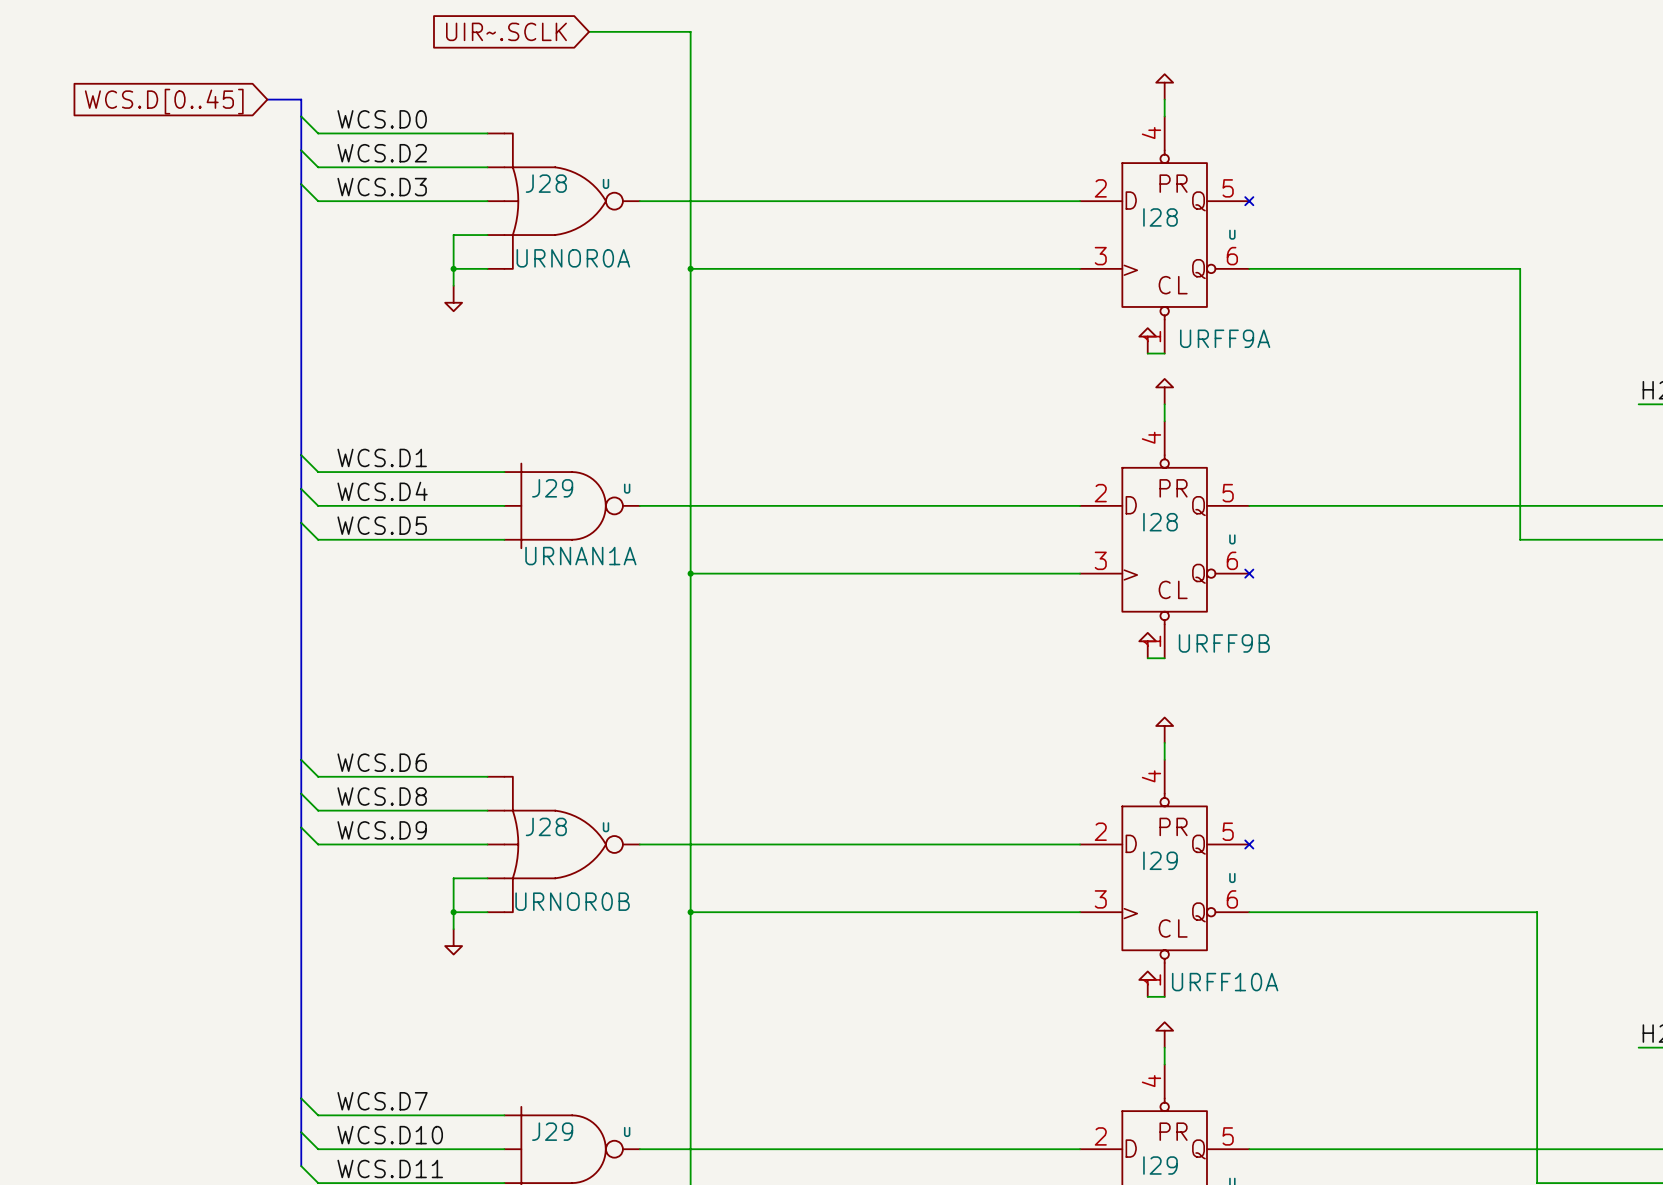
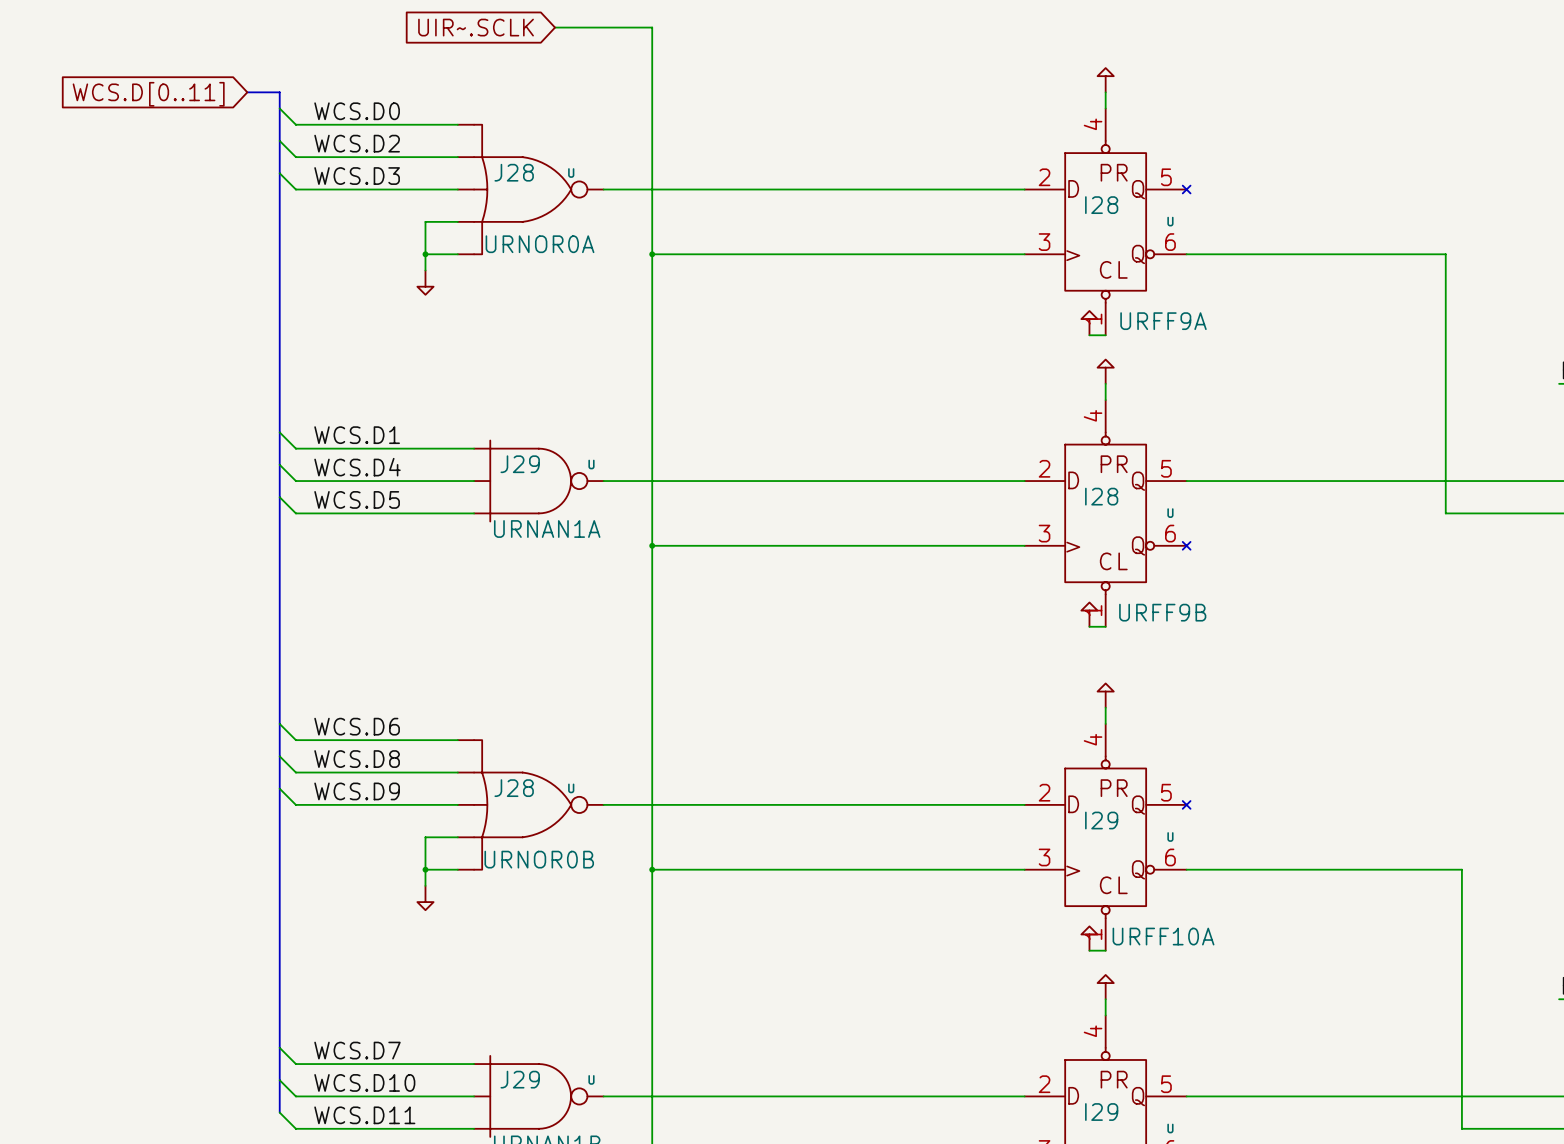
global label: WCS.D[0..45] (164, 101) -> WCS.D[0..11] (148, 94)

